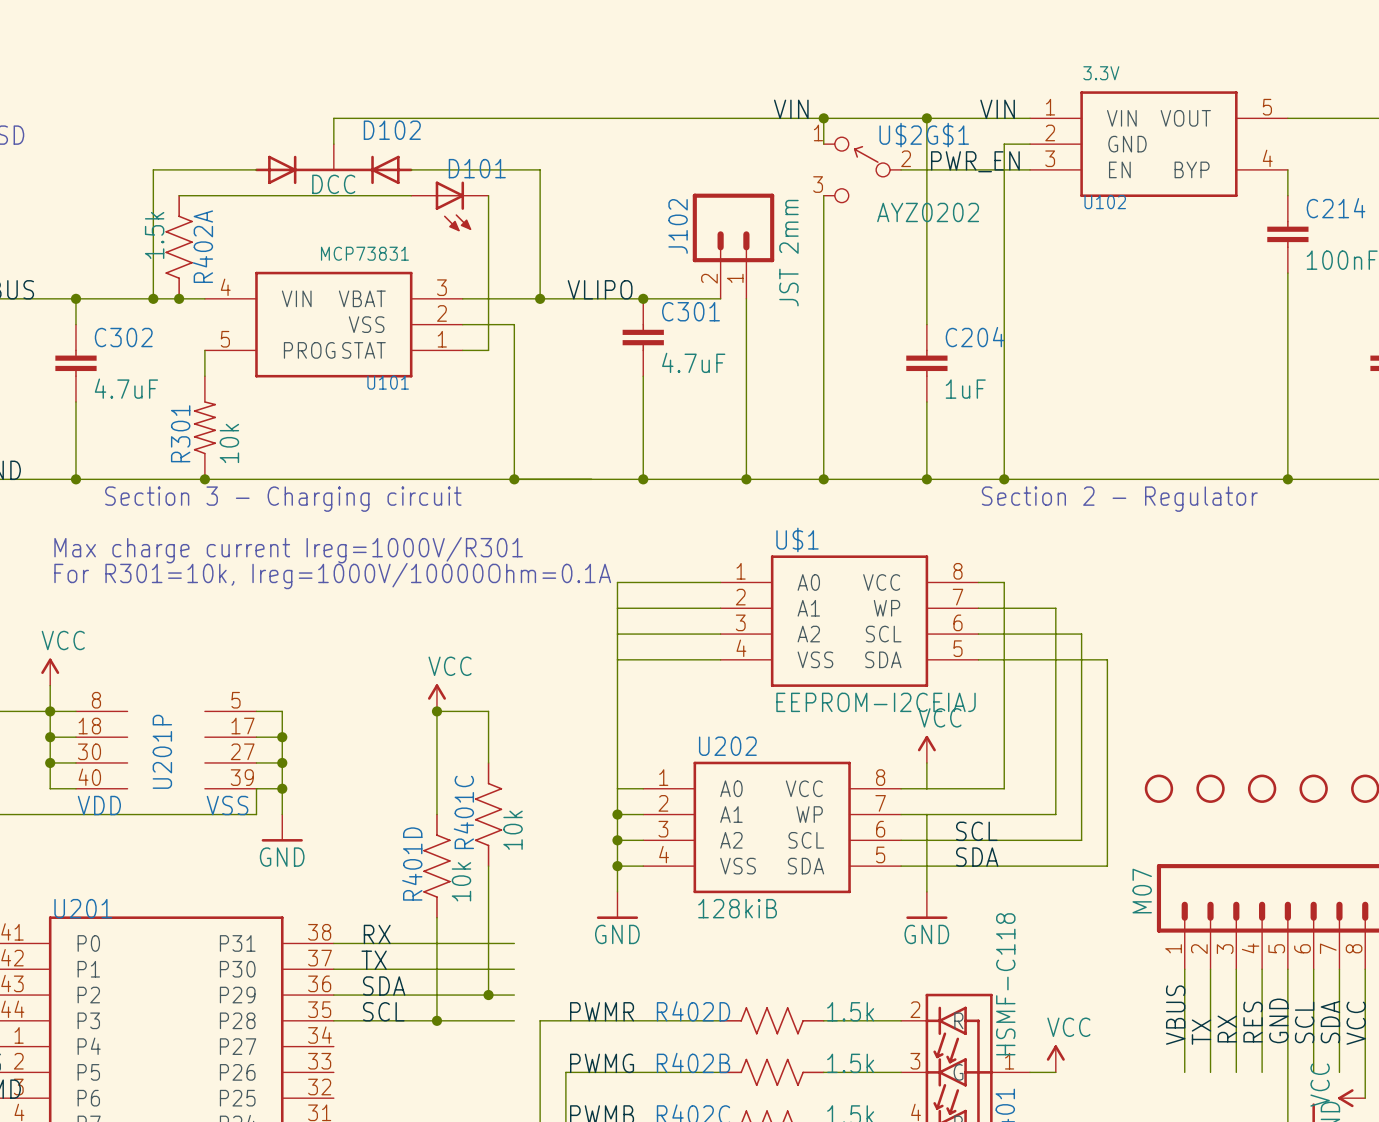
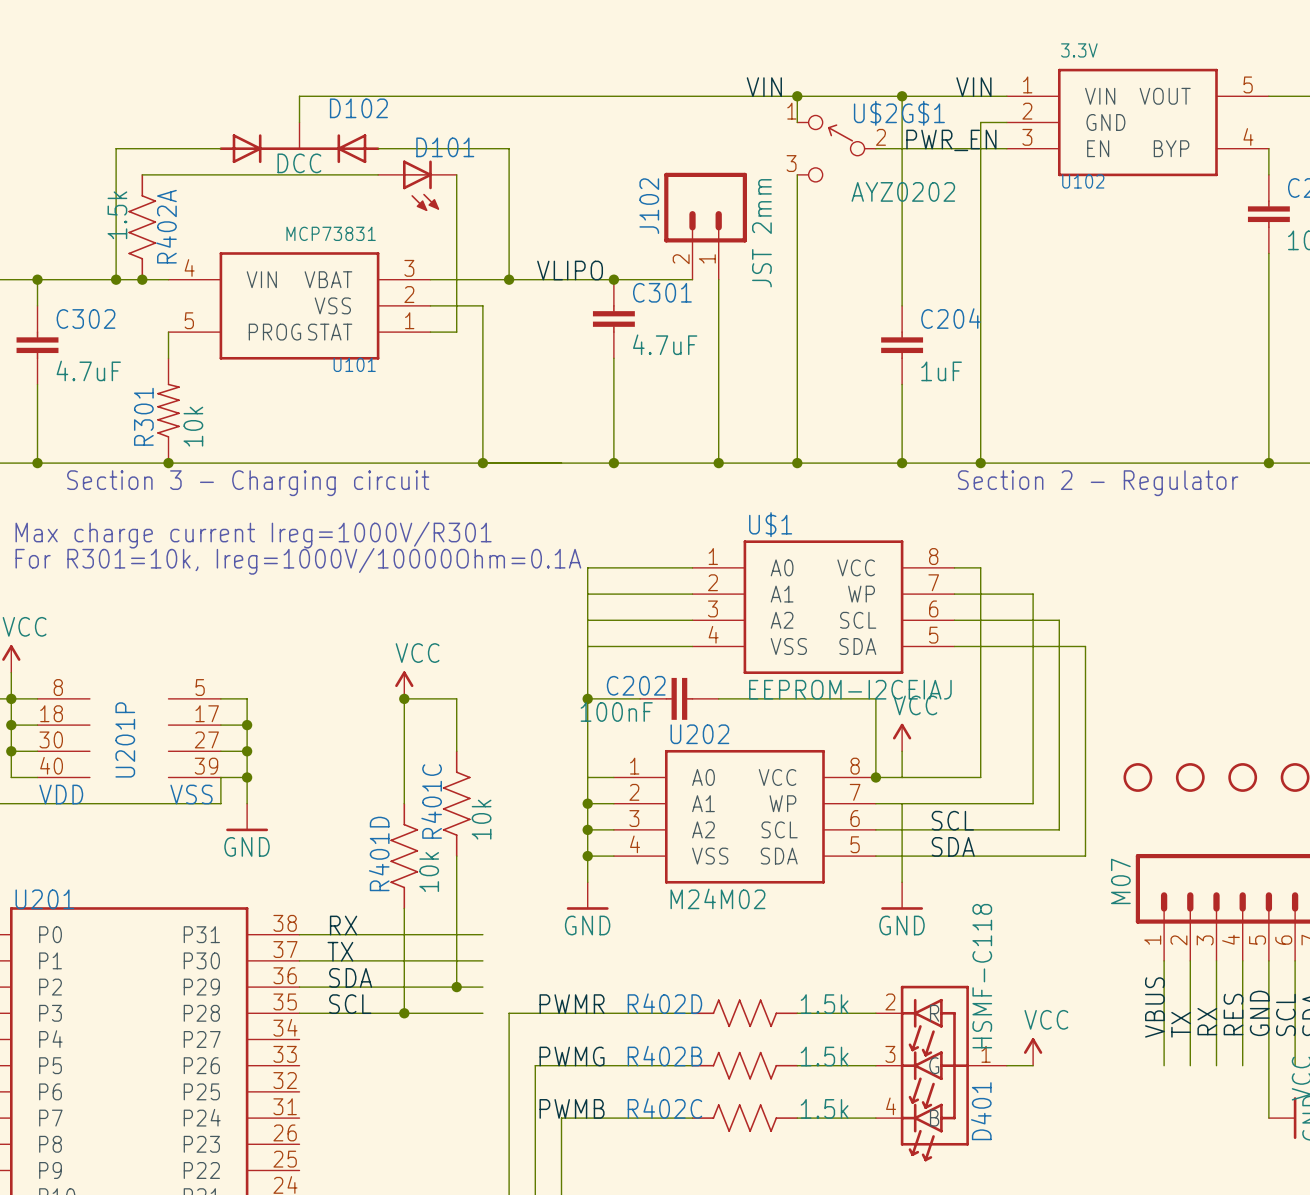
wire: none -> (587, 698) (640, 698)
junction: none -> (587, 698)
C202: none -> 100nF (679, 698)
wire: none -> (718, 698) (875, 698) (875, 777)
junction: none -> (875, 777)
U202 value: 128kiB (737, 908) -> M24M02 (717, 898)

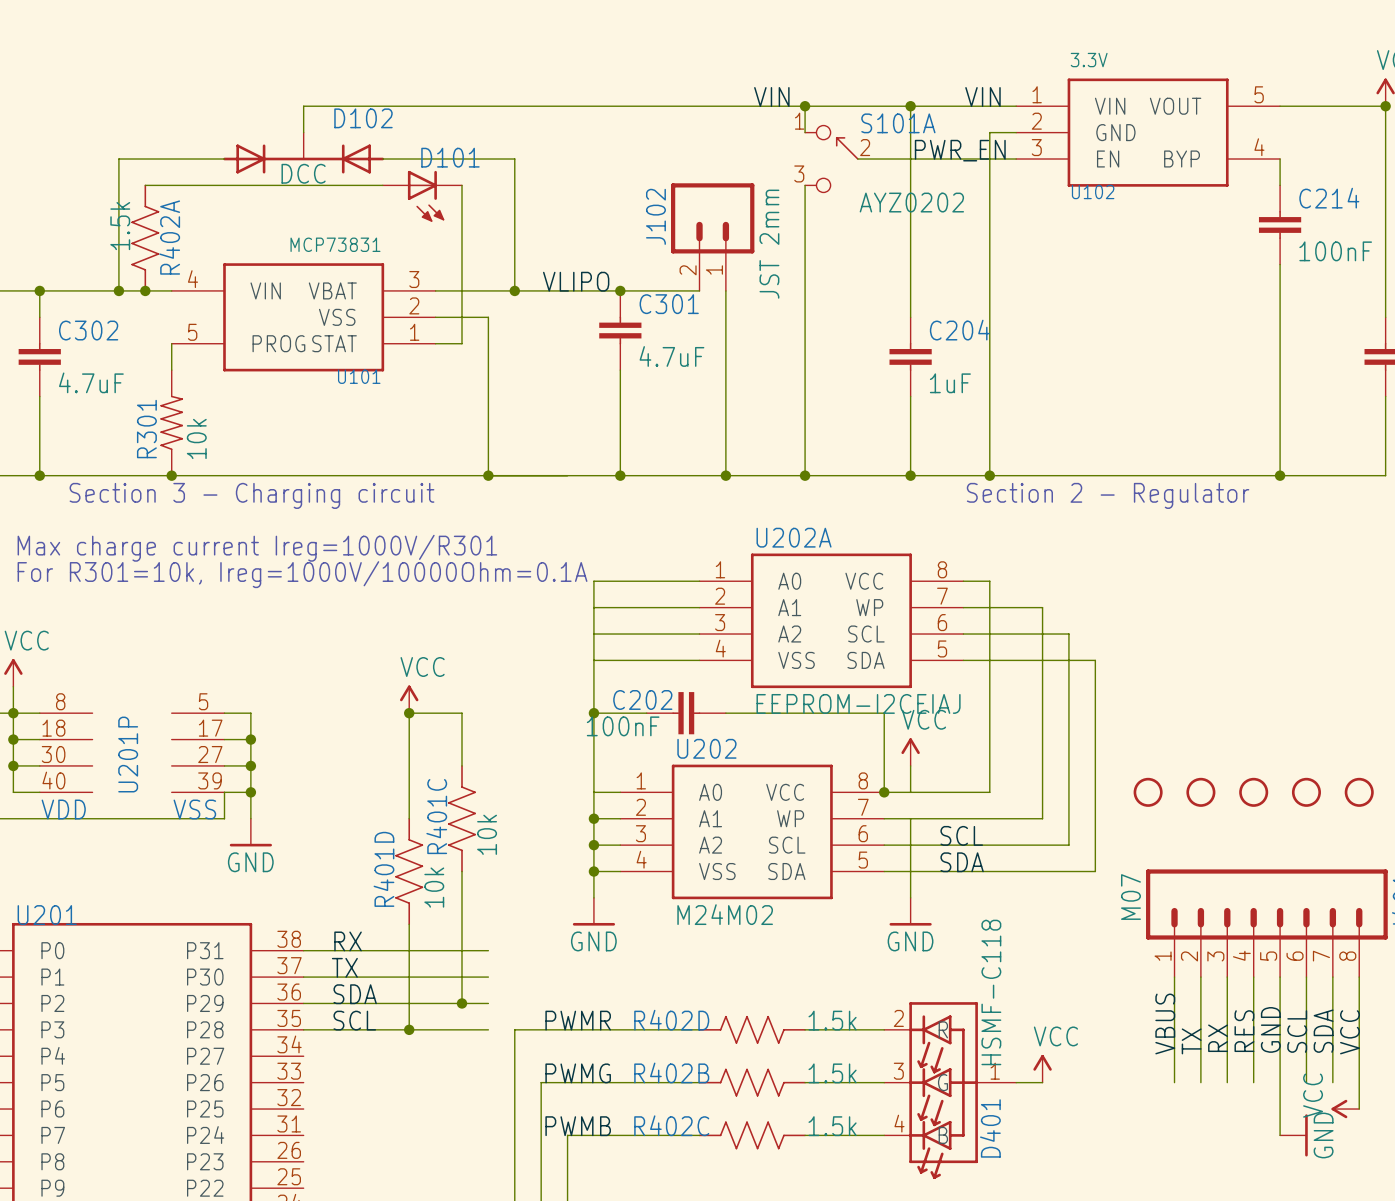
S101A: none -> AYZ0202 (831, 159)
U$2G$1: AYZ0202 (836, 148) -> none
wire: none -> (857, 159) (884, 159)
U$1 name: U$1 (770, 524) -> U202A (794, 537)

